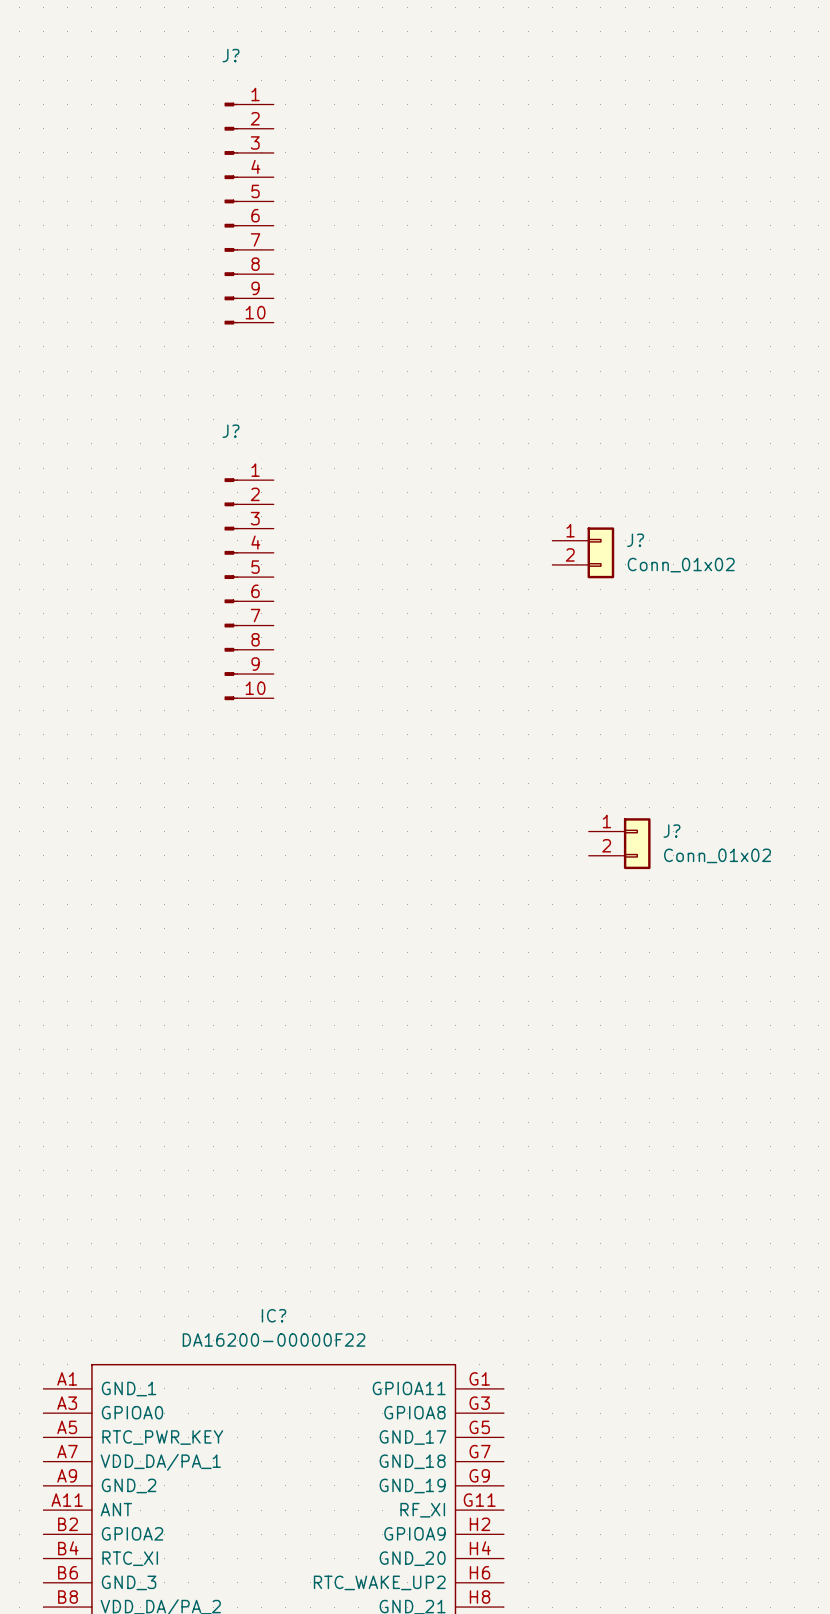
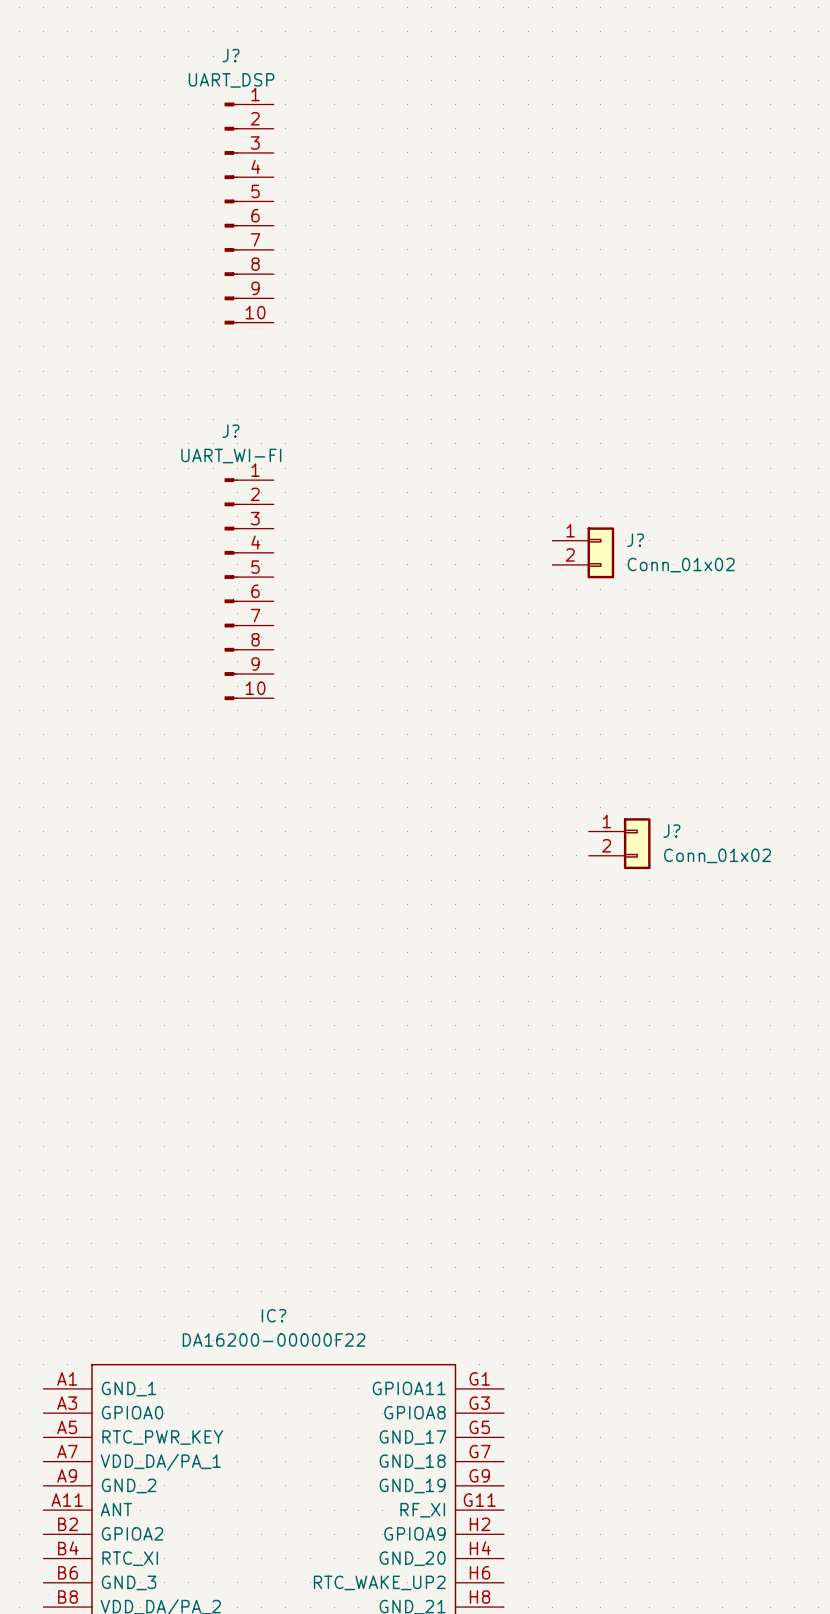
J? value: none -> UART_DSP (231, 80)
J? value: none -> UART_WI-FI (231, 456)

